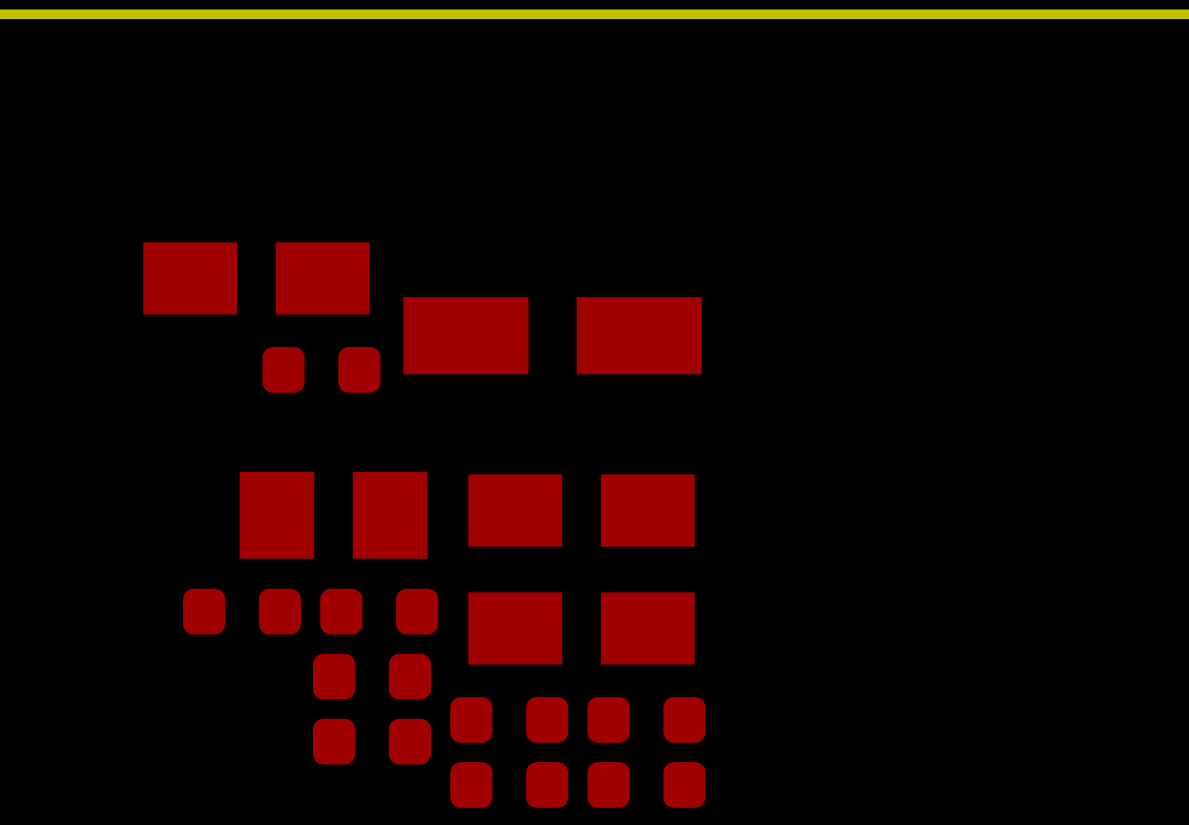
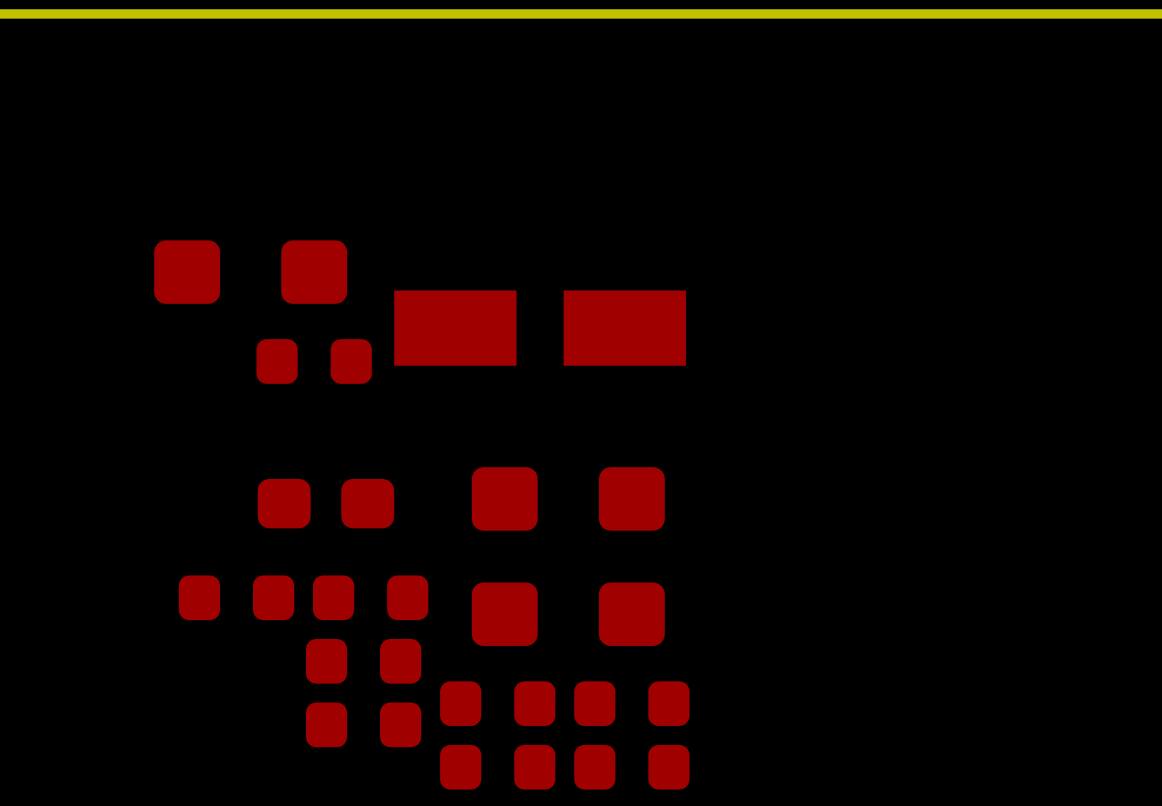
part footprint: [143, 242, 370, 315] -> [154, 240, 348, 304]
part footprint: [239, 471, 428, 559] -> [257, 478, 395, 529]
part footprint: [468, 474, 695, 547] -> [471, 467, 665, 531]
part footprint: [468, 592, 695, 665] -> [471, 582, 665, 647]

